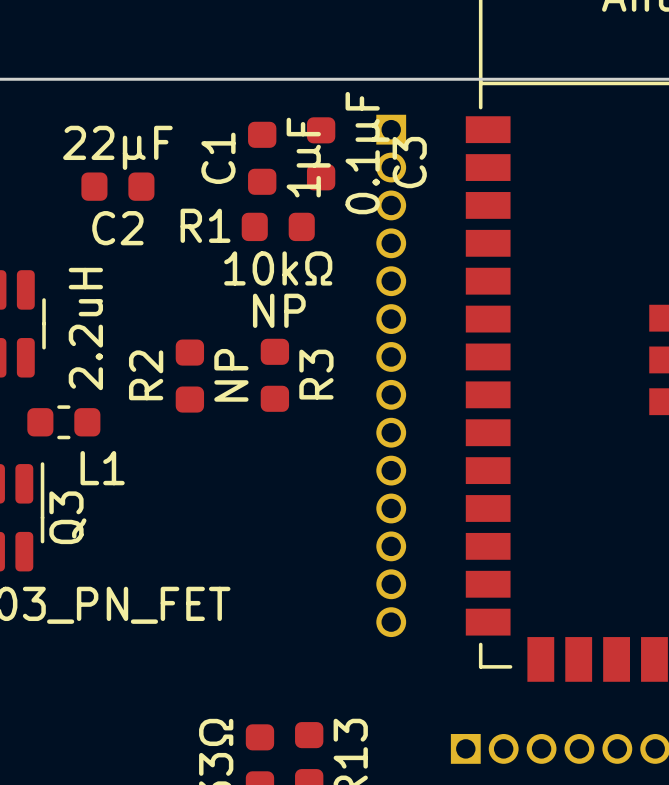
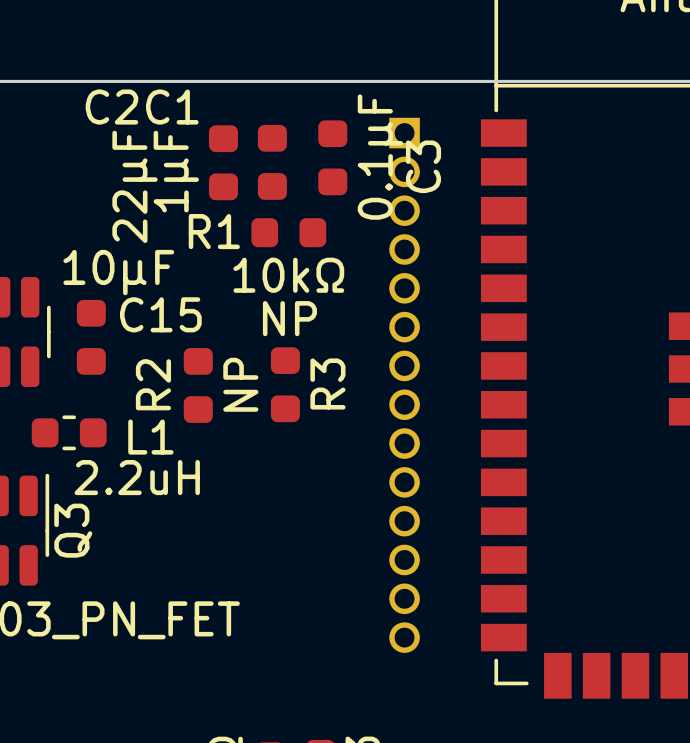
C2 value position: 22μF (117, 147) -> 22μF (135, 186)
C1 value position: 1μF (308, 157) -> 1μF (176, 171)
C1 name rotation: 0° (218, 158) -> 90° clockwise (172, 107)
C1 name position: C1 (218, 158) -> C1 (172, 107)
C2 rotation: 0° (117, 186) -> 90° clockwise (223, 162)
C2 position: (117, 186) -> (223, 162)
C2 name position: C2 (117, 228) -> C2 (111, 107)
L1 value rotation: 0° (85, 329) -> 90° clockwise (137, 477)
C15: none -> 10μF (91, 337)
L1 name position: L1 (102, 468) -> L1 (150, 437)

